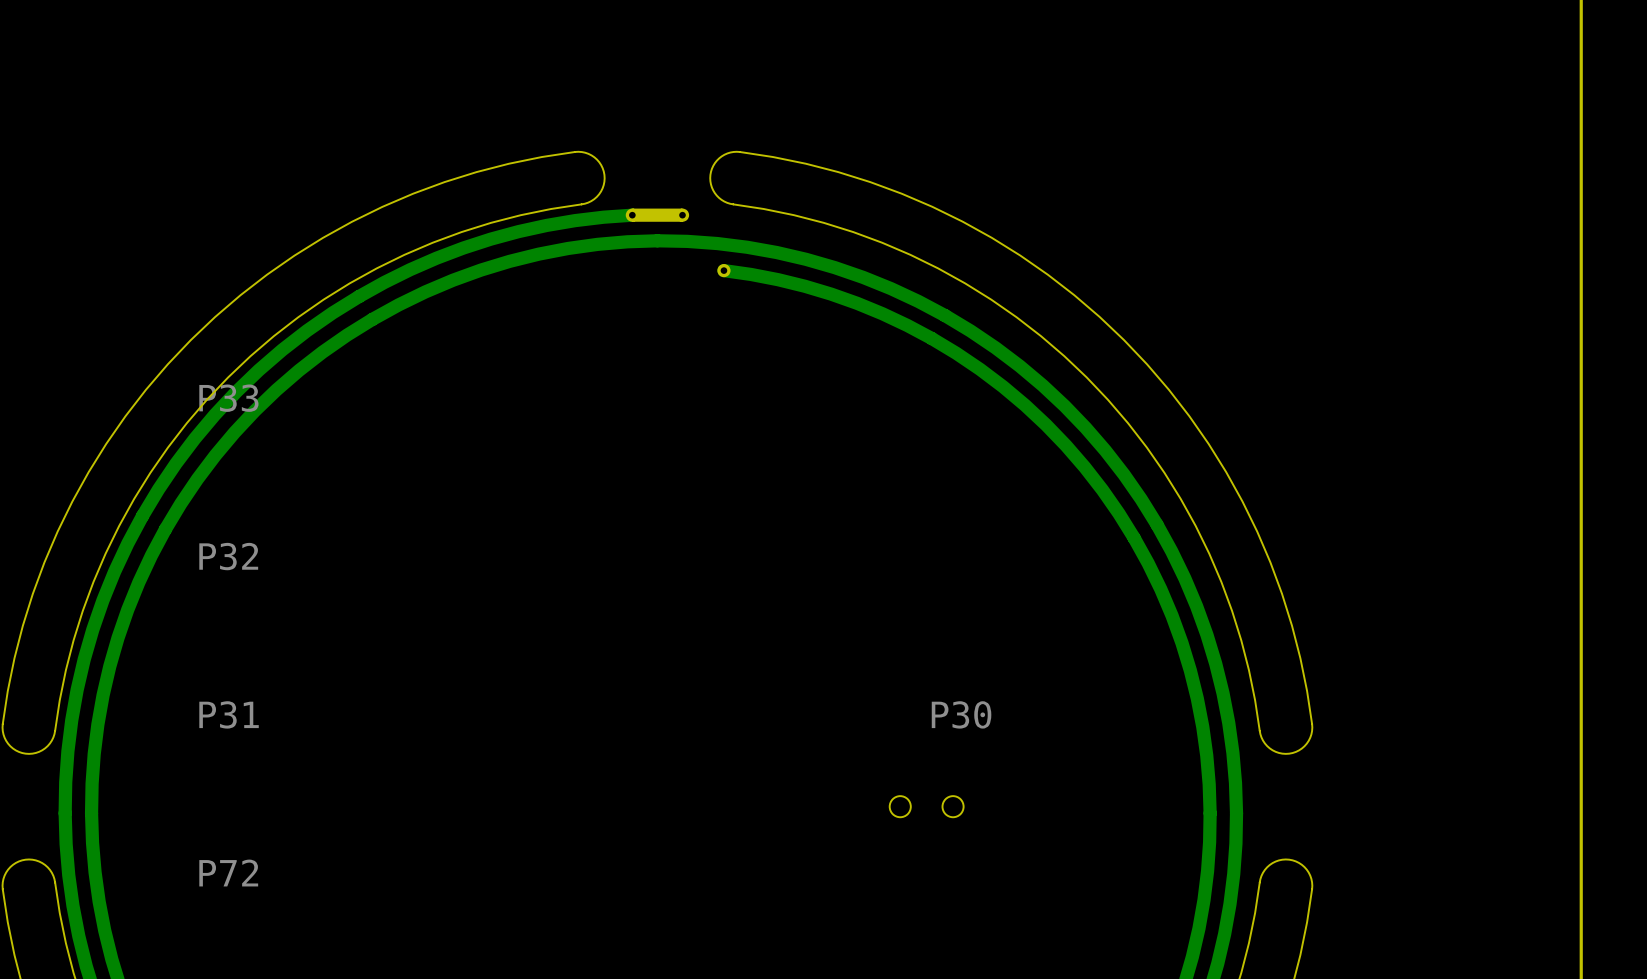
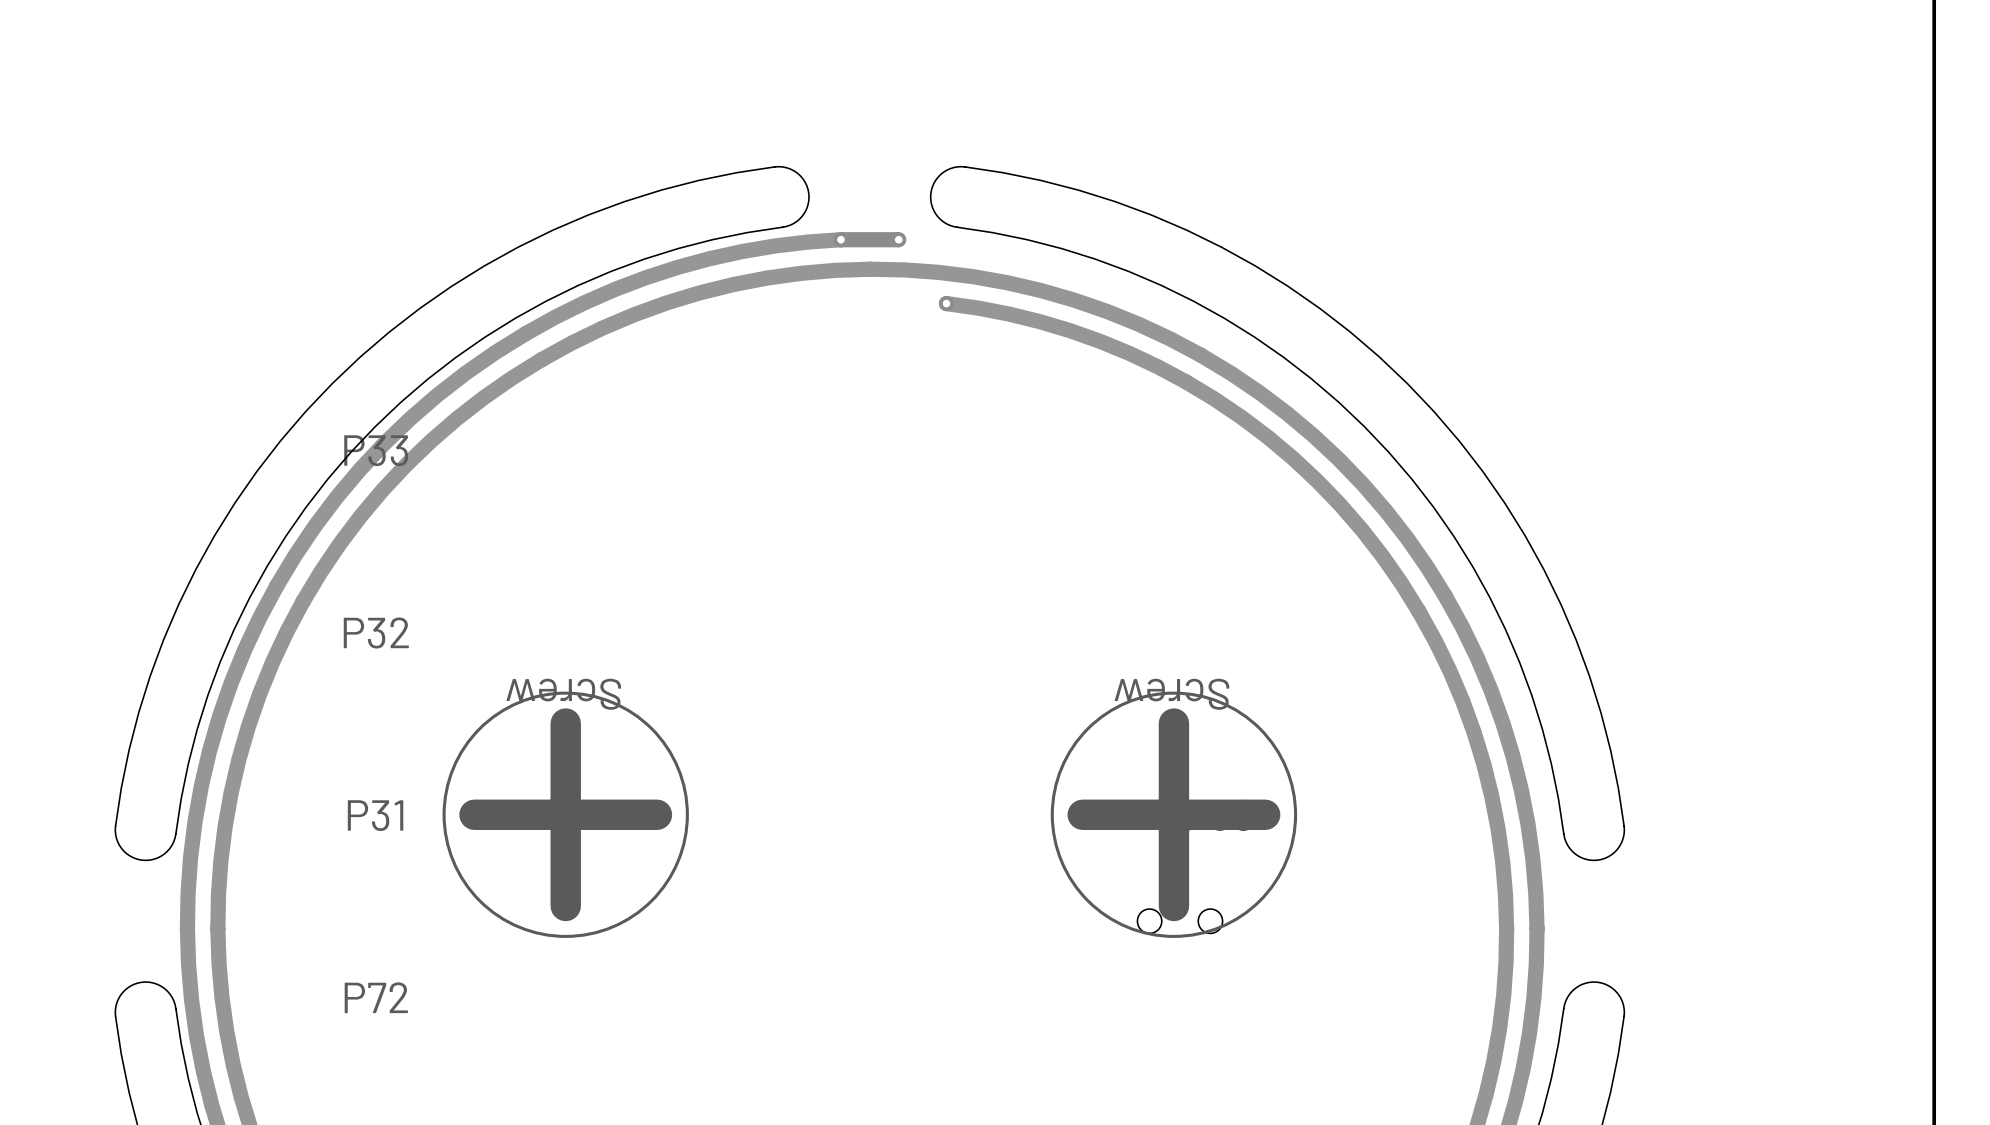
drawing: none -> [442, 691, 689, 938]
drawing: none -> [1050, 691, 1298, 938]

